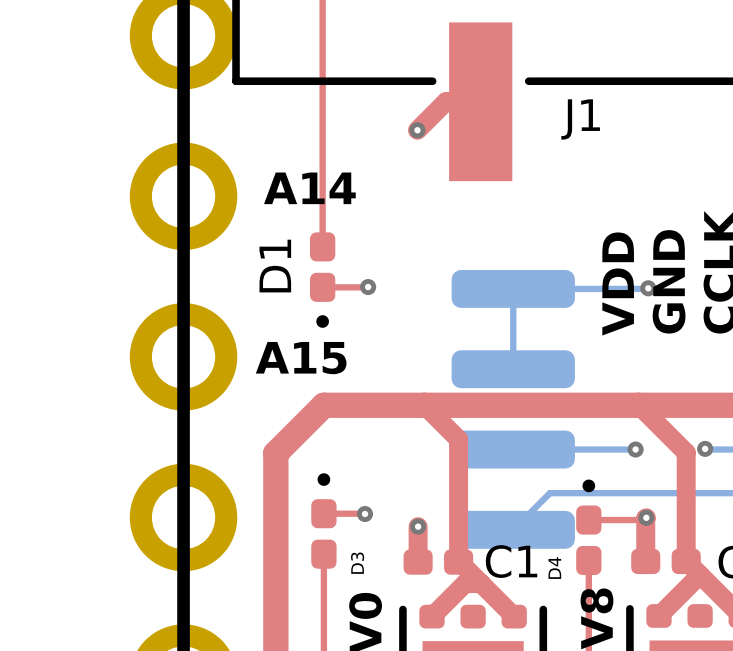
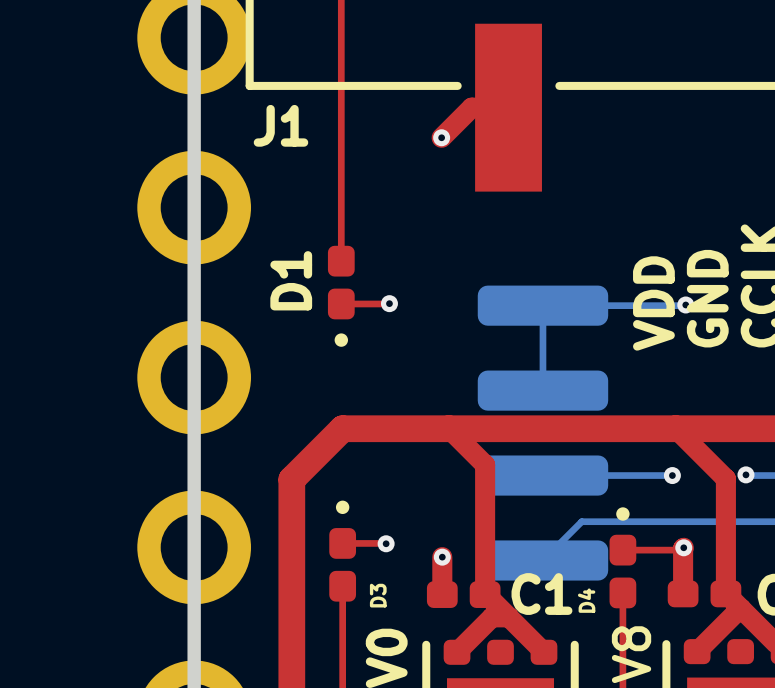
J1 name position: J1 (580, 119) -> J1 (280, 125)
text: A14 (309, 188) -> none
text: A15 (301, 358) -> none

